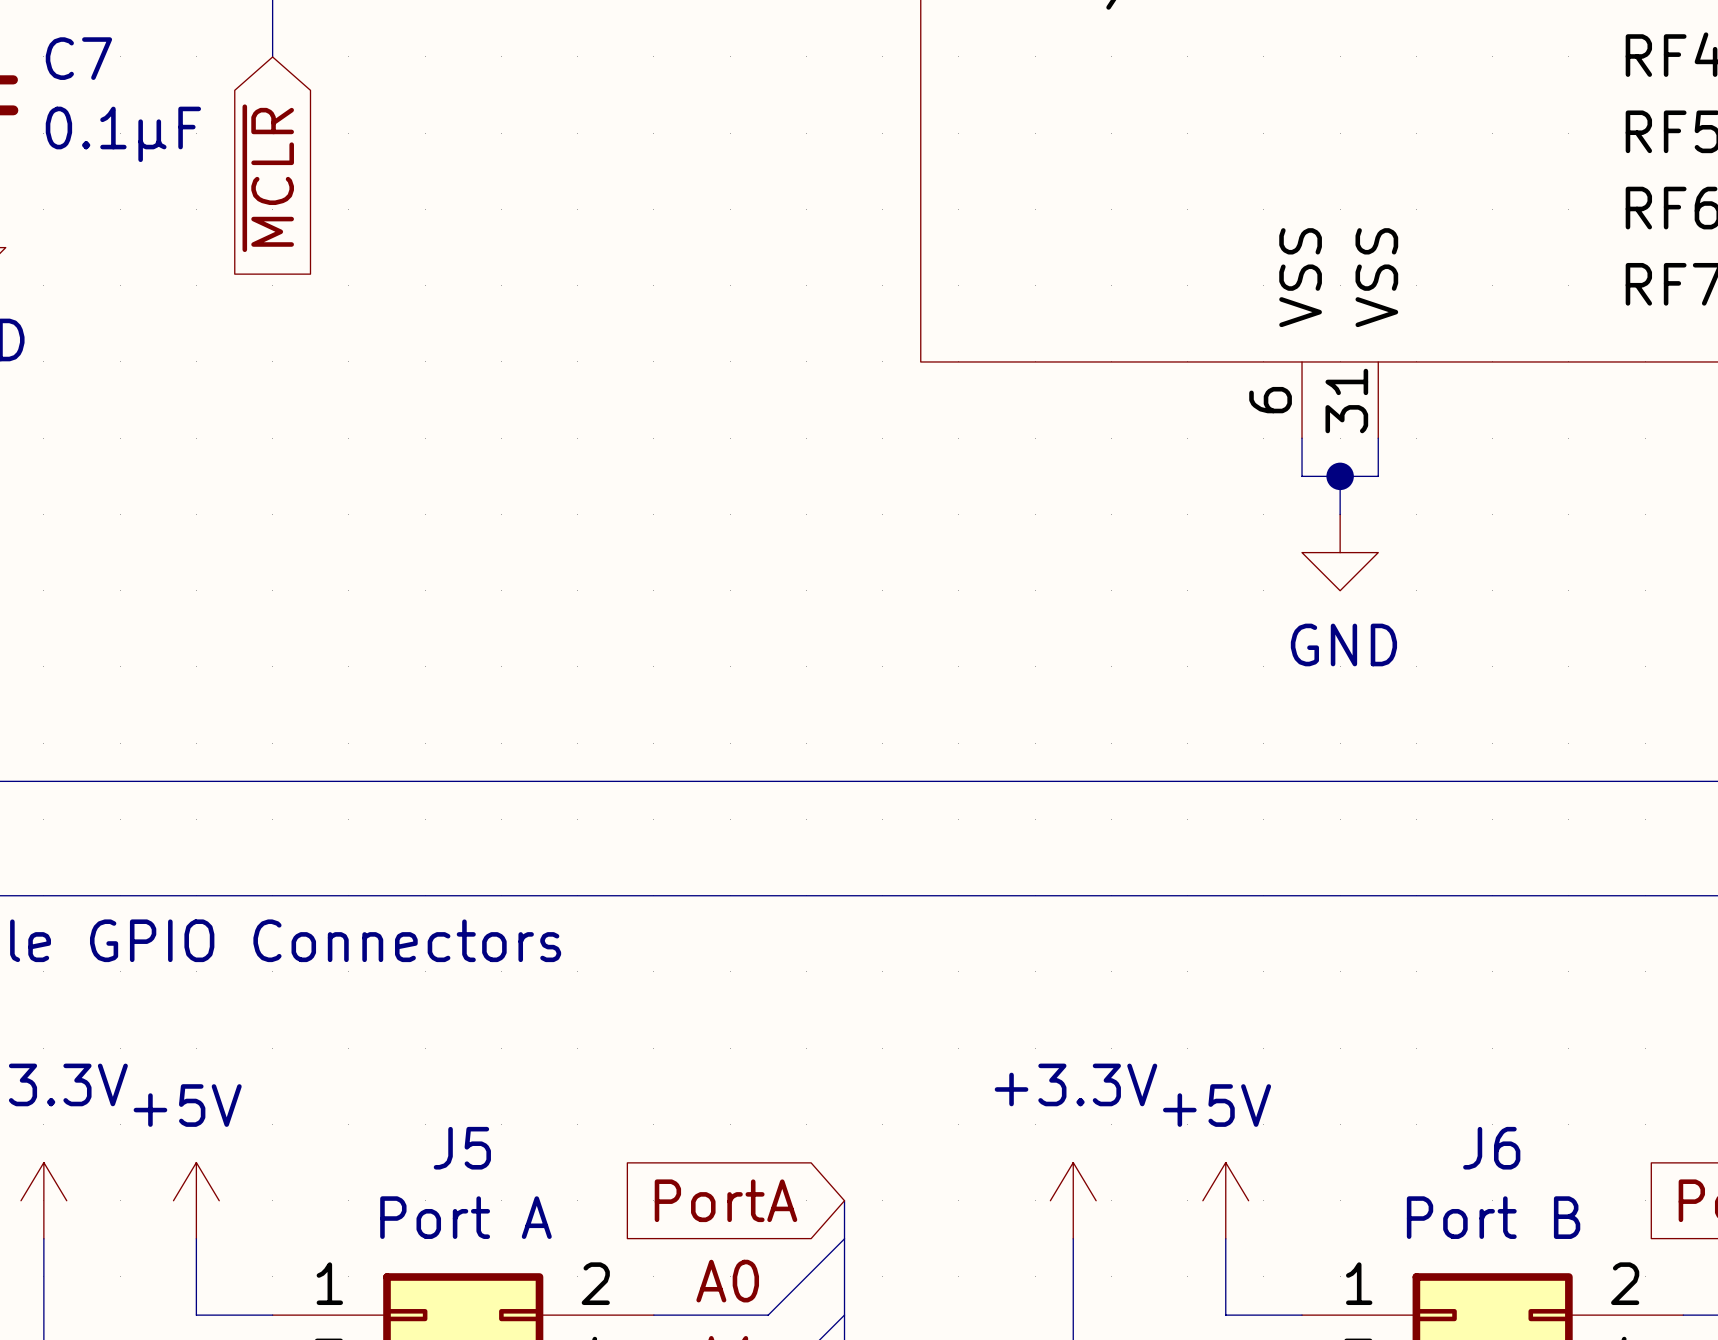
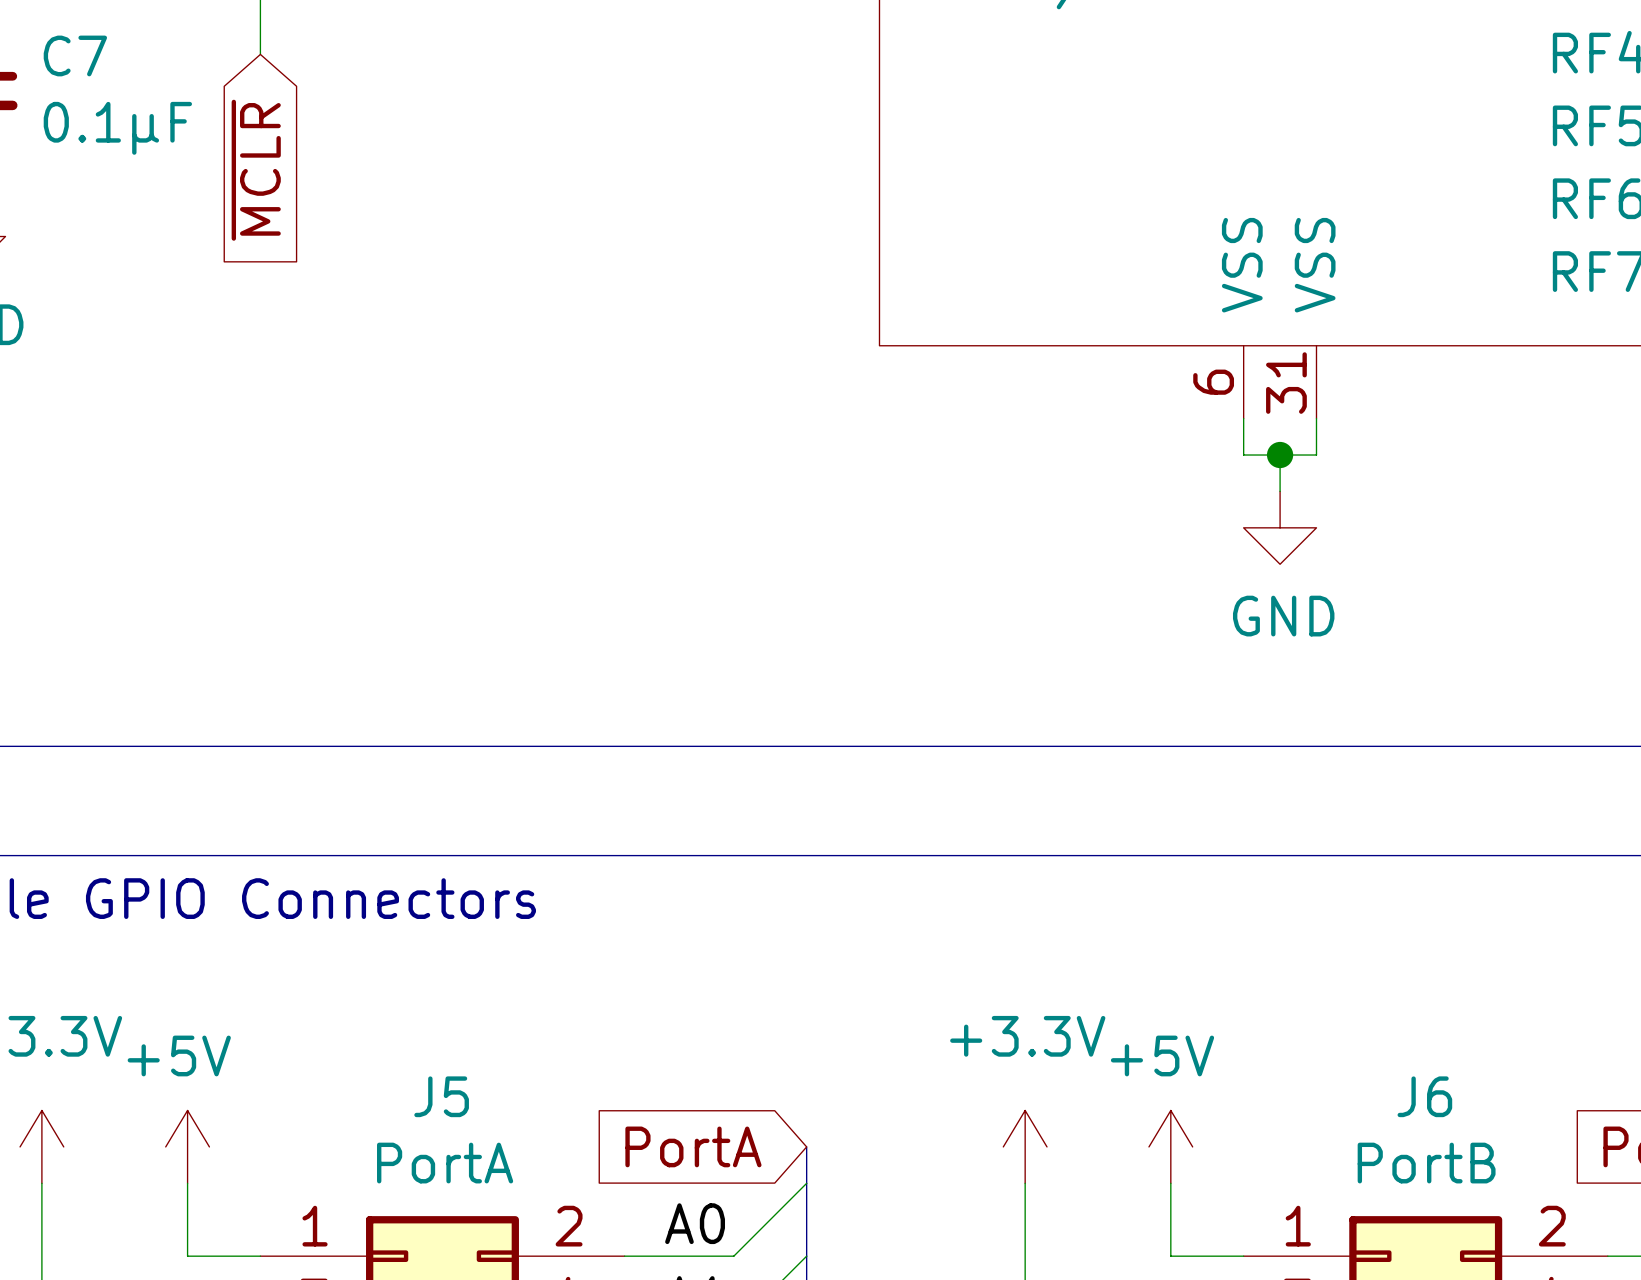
J5 value: Port A (465, 1217) -> PortA (445, 1163)
J6 value: Port B (1493, 1217) -> PortB (1426, 1163)

